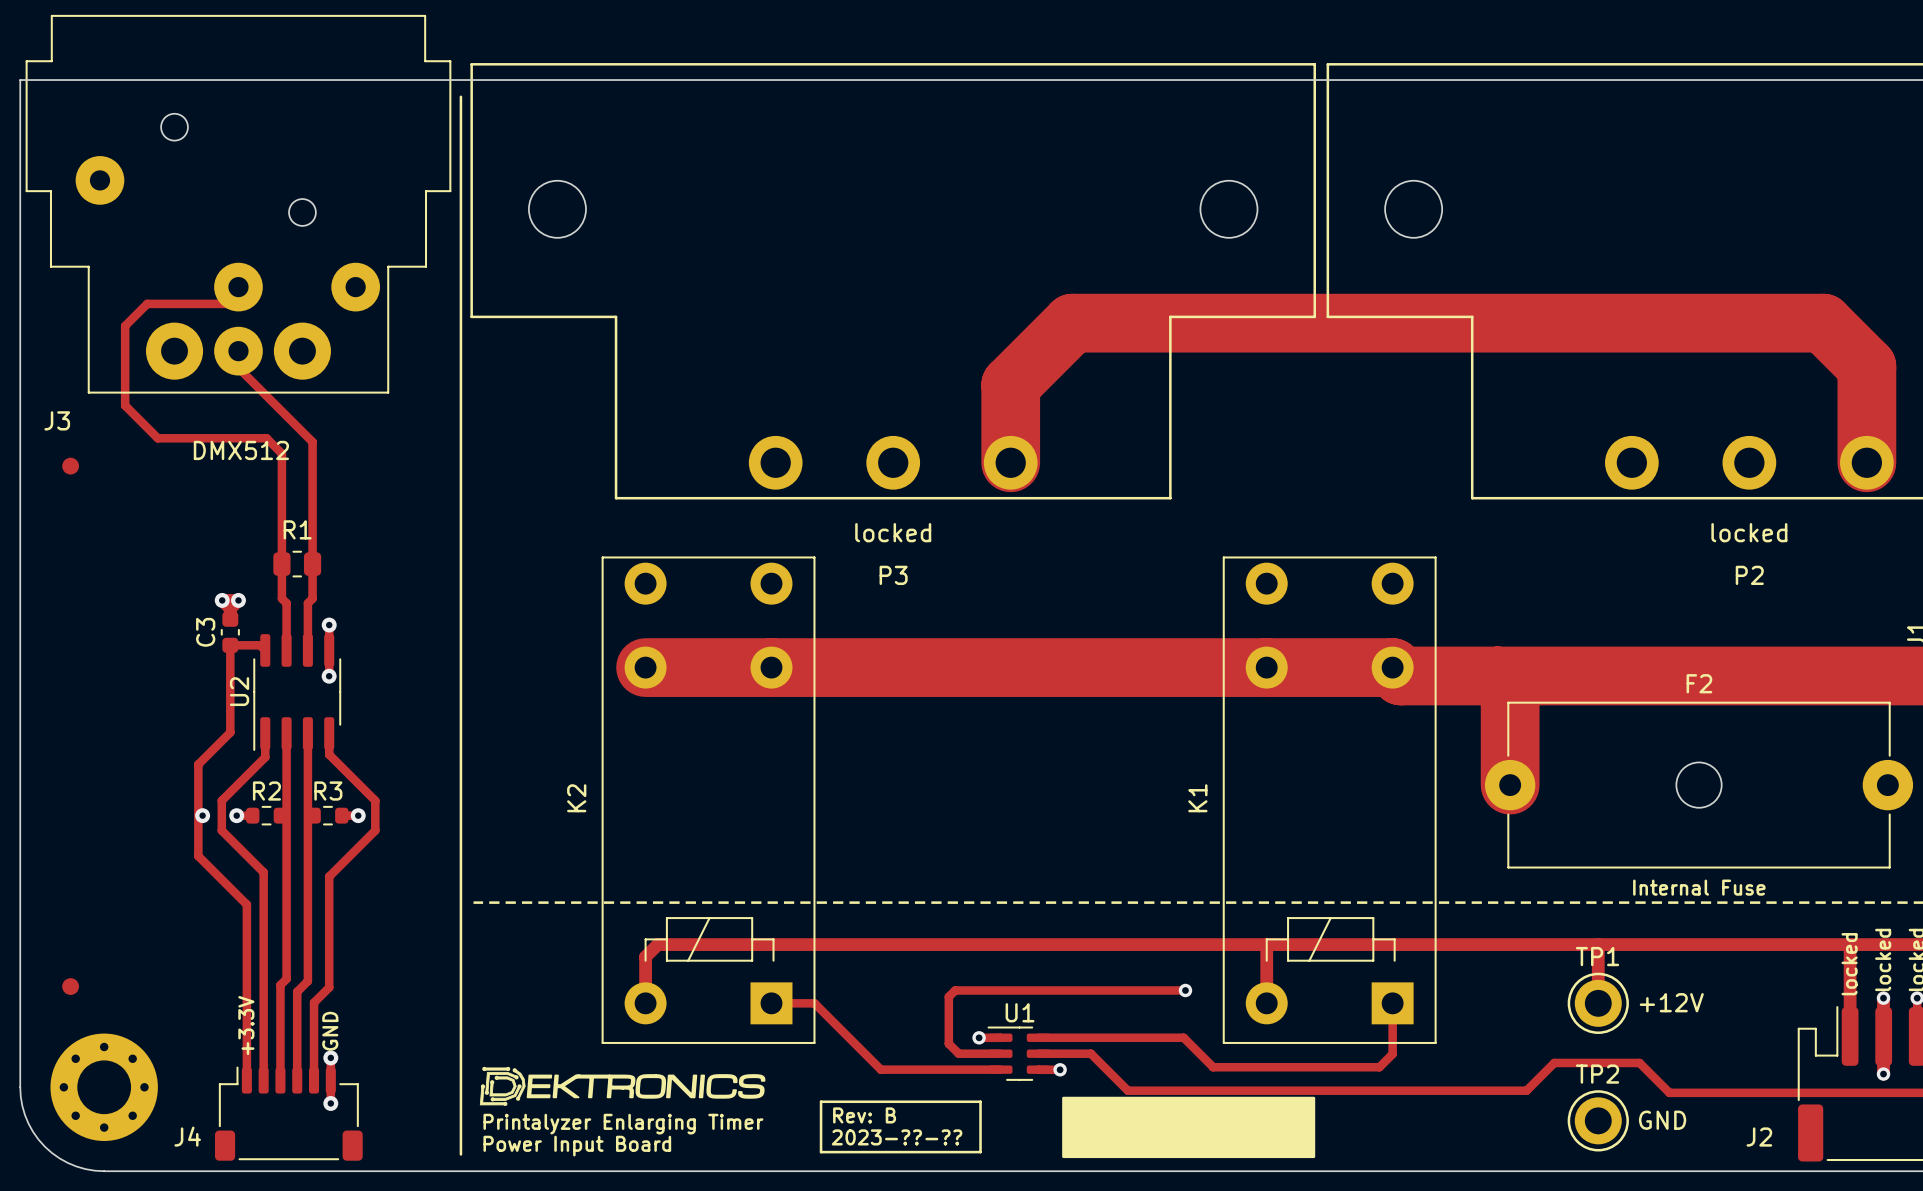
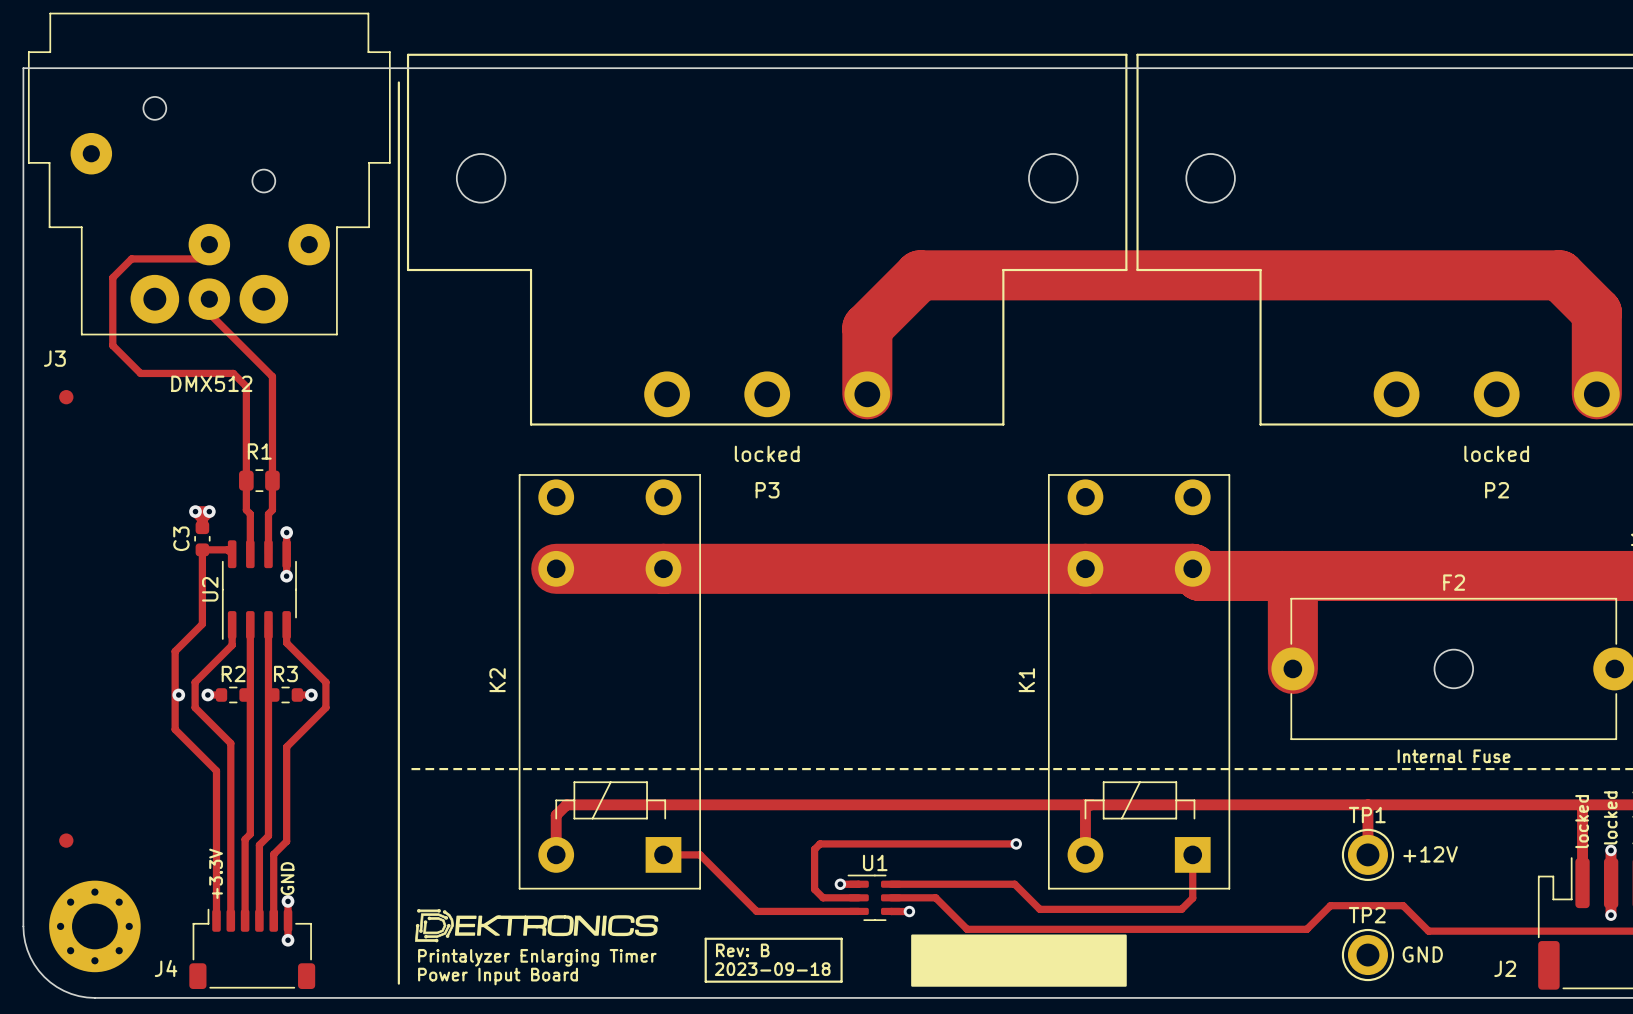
text: 2023-??-?? (897, 1137) -> 2023-09-18 (772, 969)

